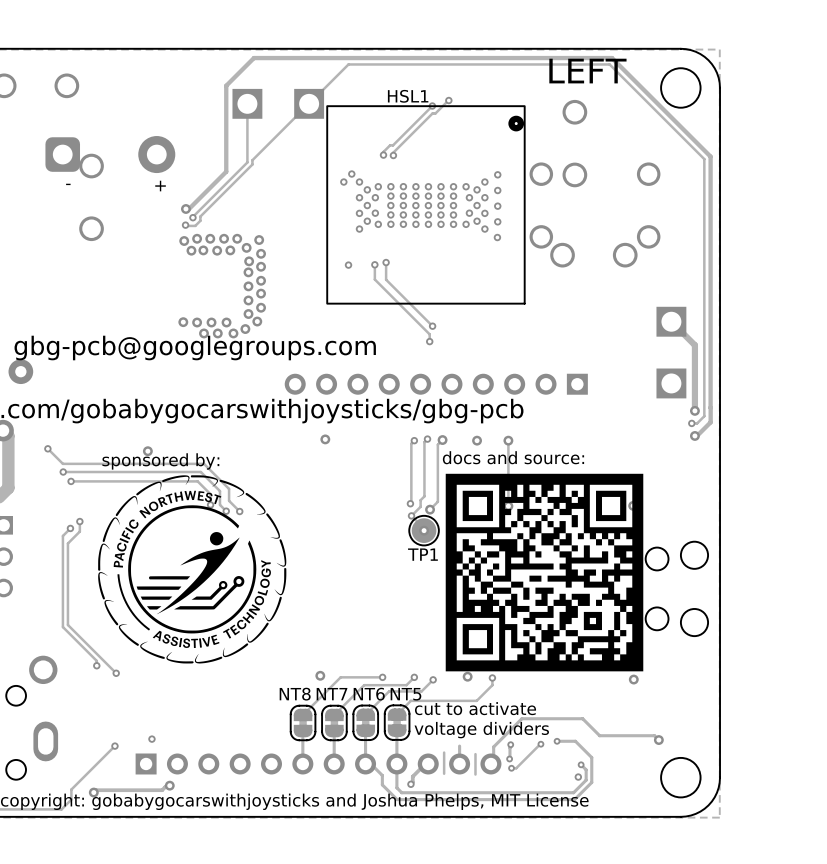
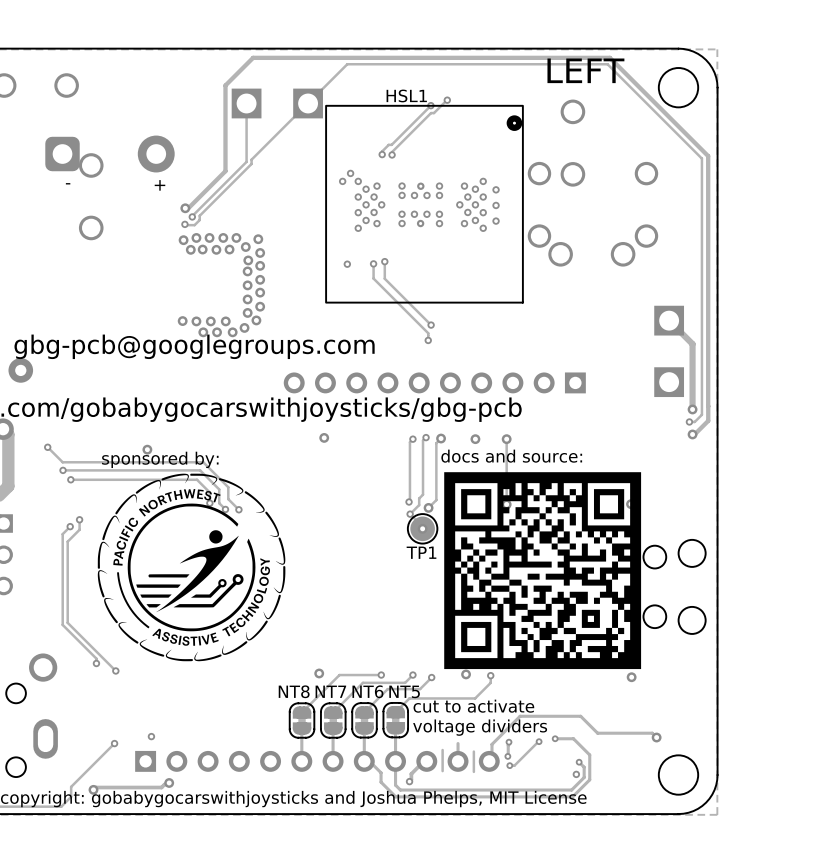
via: (497, 174) -> none
via: (390, 186) -> none
via: (415, 186) -> none
via: none -> (420, 186)
via: (428, 186) -> none
via: (453, 186) -> none
via: (390, 196) -> none
via: (453, 196) -> none
via: none -> (381, 204)
via: (390, 205) -> none
via: (403, 205) -> none
via: (415, 205) -> none
via: (428, 205) -> none
via: (440, 205) -> none
via: (453, 205) -> none
via: none -> (459, 204)
via: (390, 214) -> none
via: (453, 215) -> none
via: (390, 224) -> none
via: (415, 224) -> none
via: none -> (420, 223)
via: (428, 224) -> none
via: (453, 224) -> none
via: (497, 237) -> none

